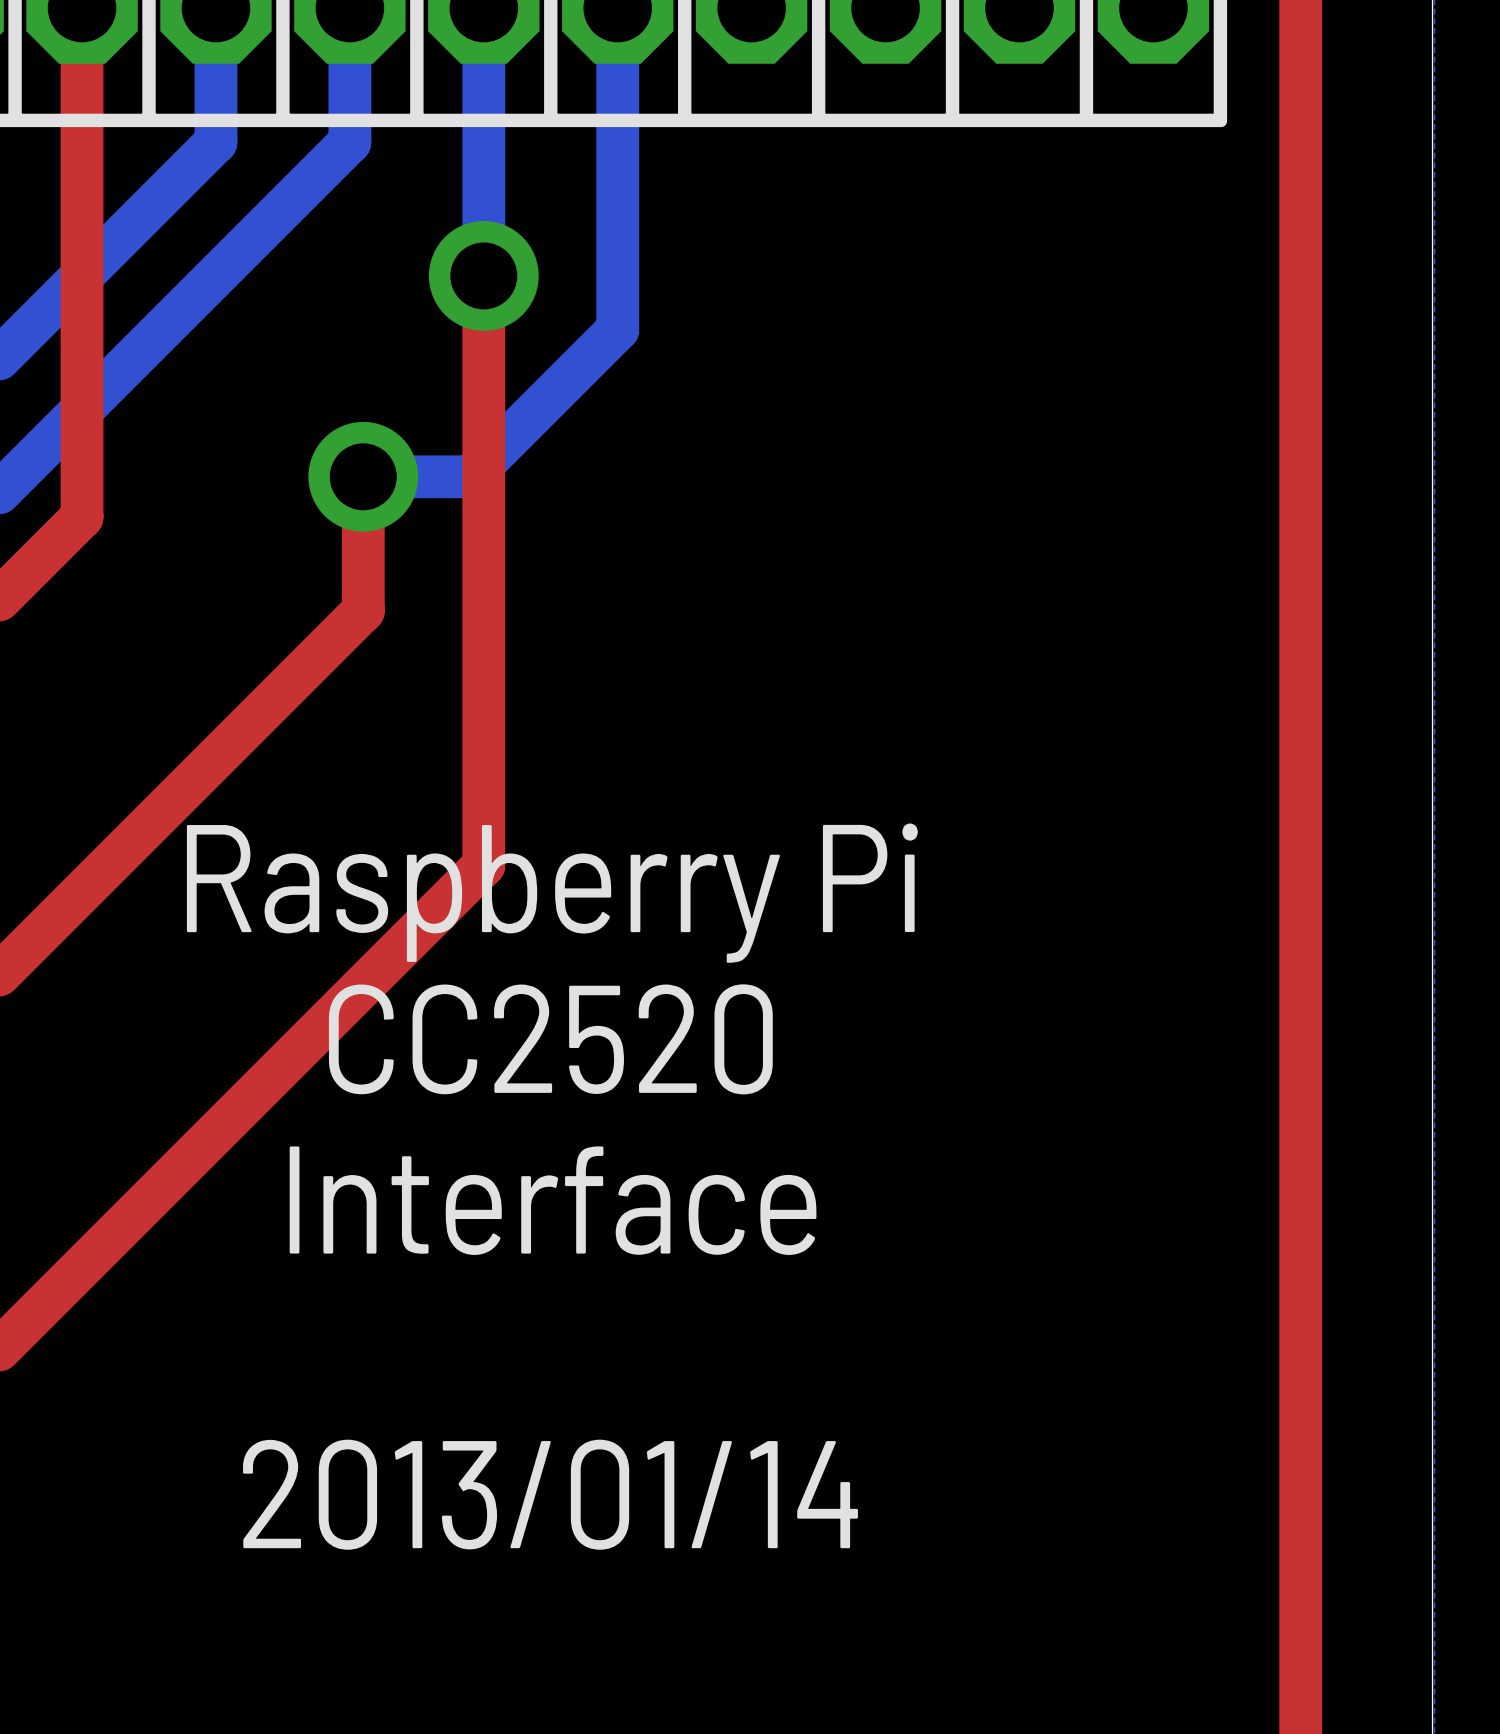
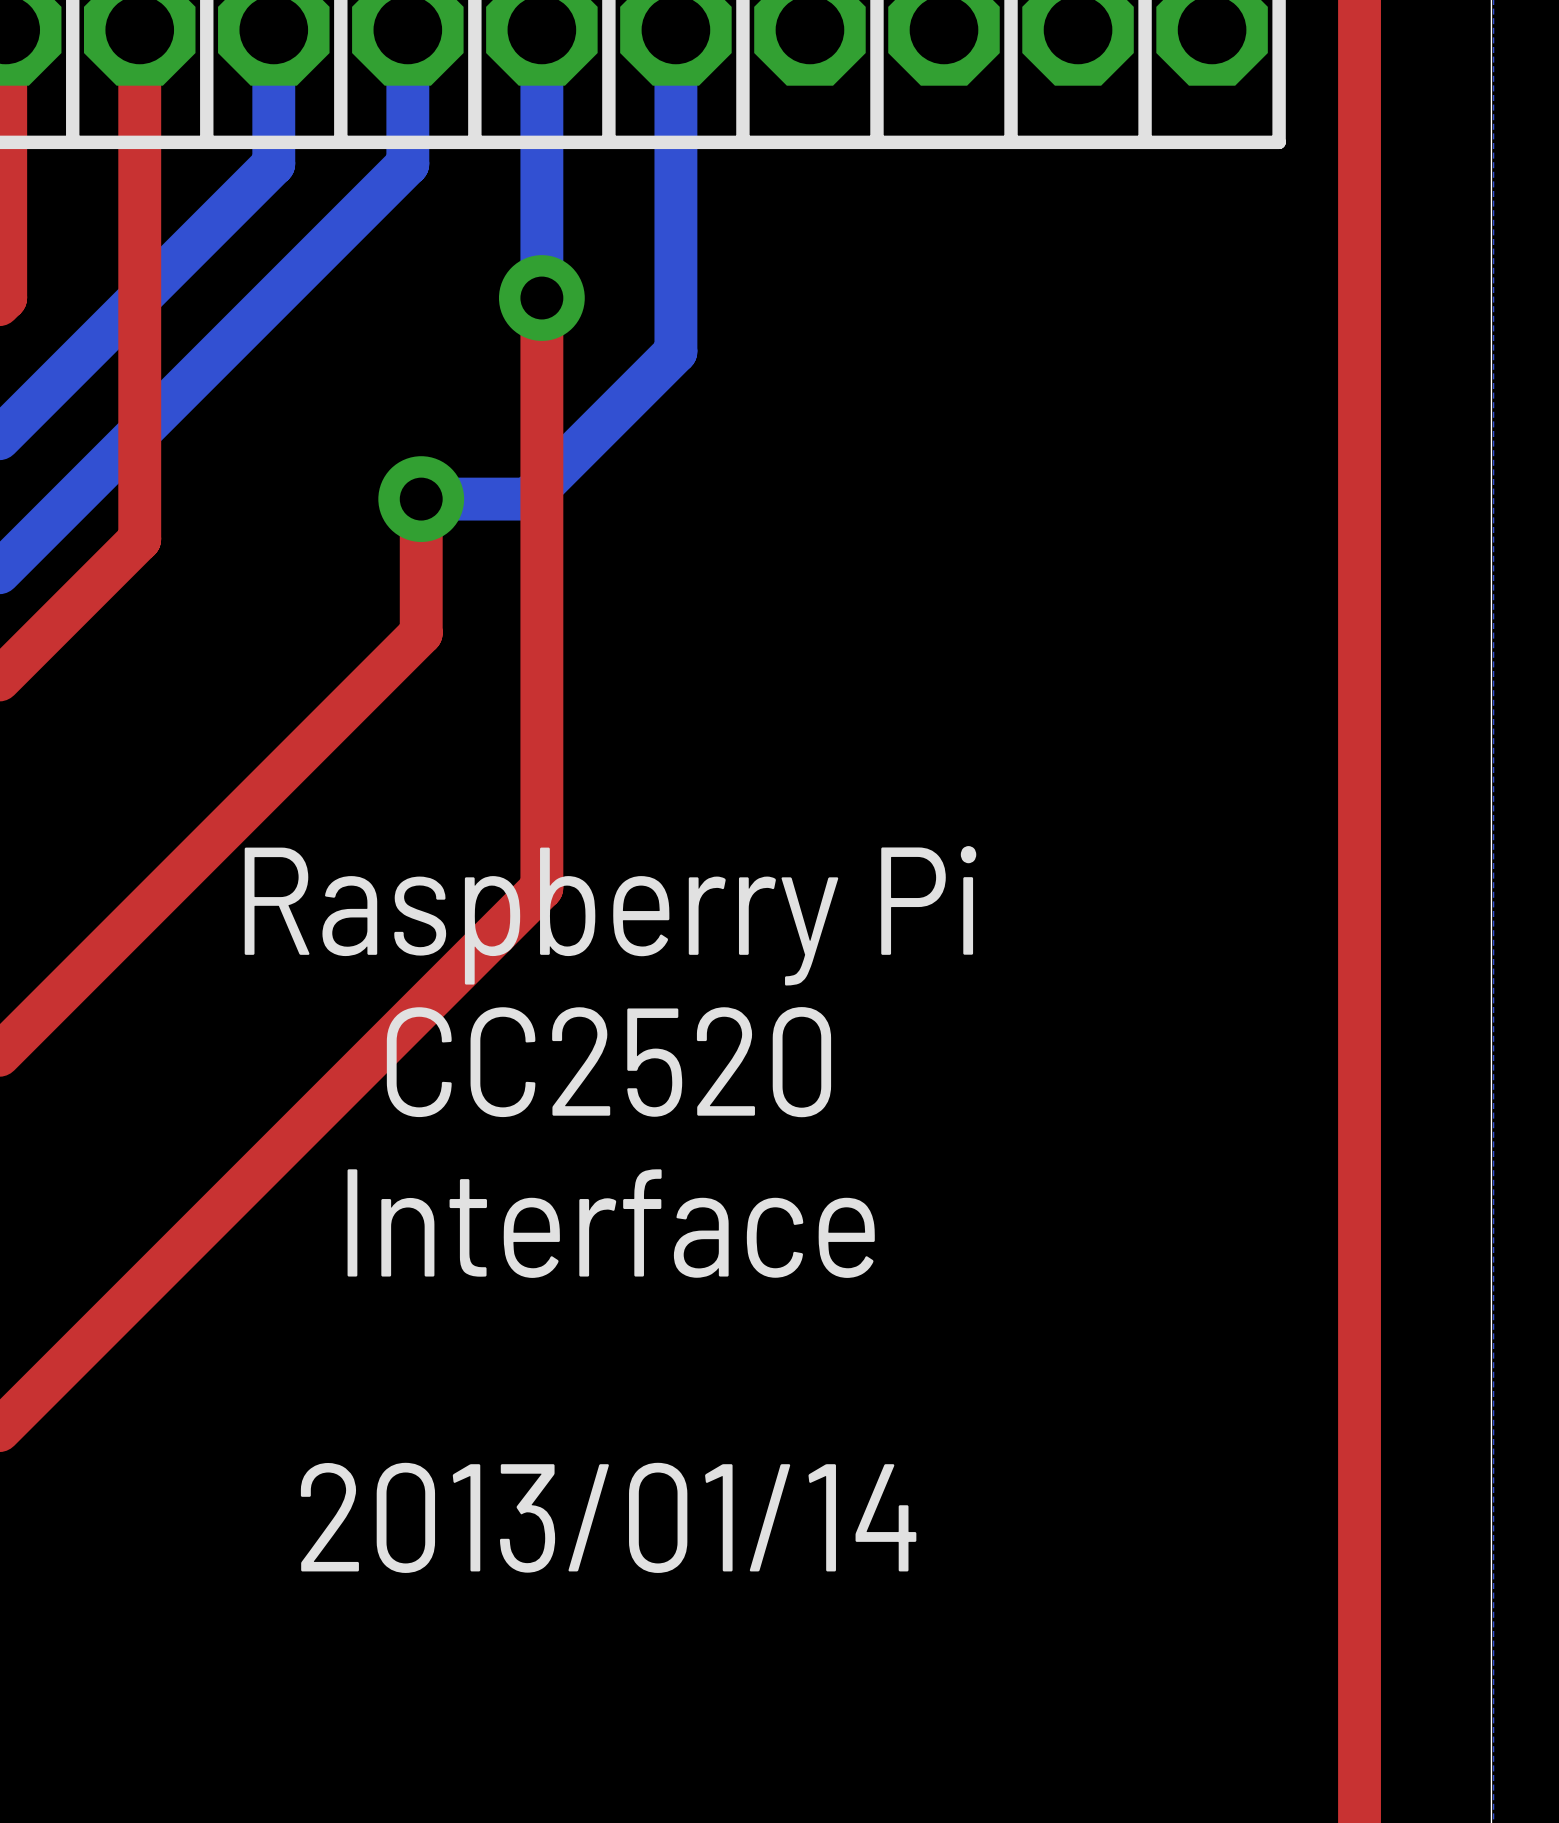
via size: [428, 221, 539, 331] -> [498, 255, 585, 341]
via size: [308, 421, 419, 532] -> [378, 456, 465, 542]

